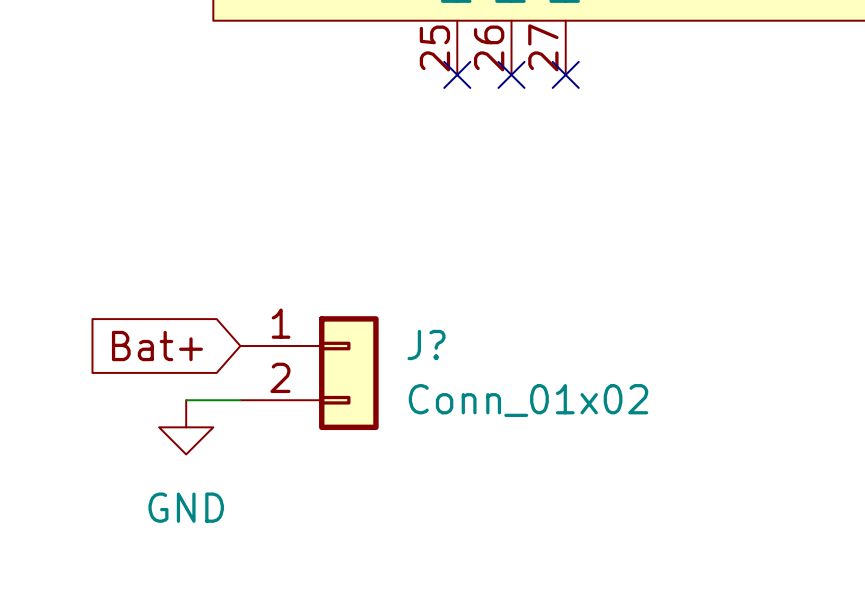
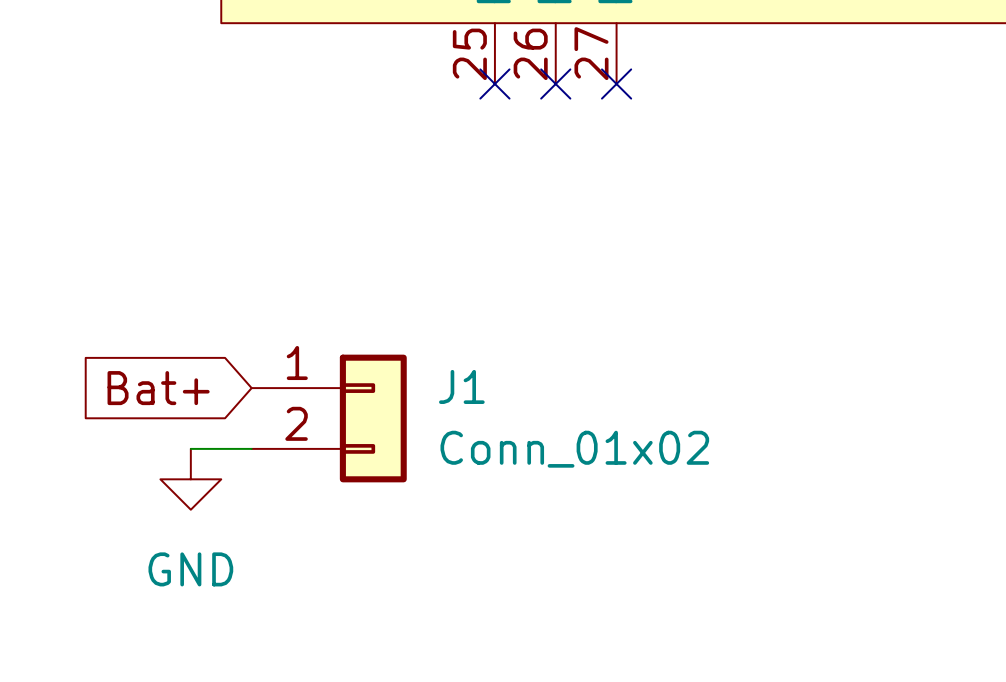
J? name: J? (426, 344) -> J1 (461, 386)

